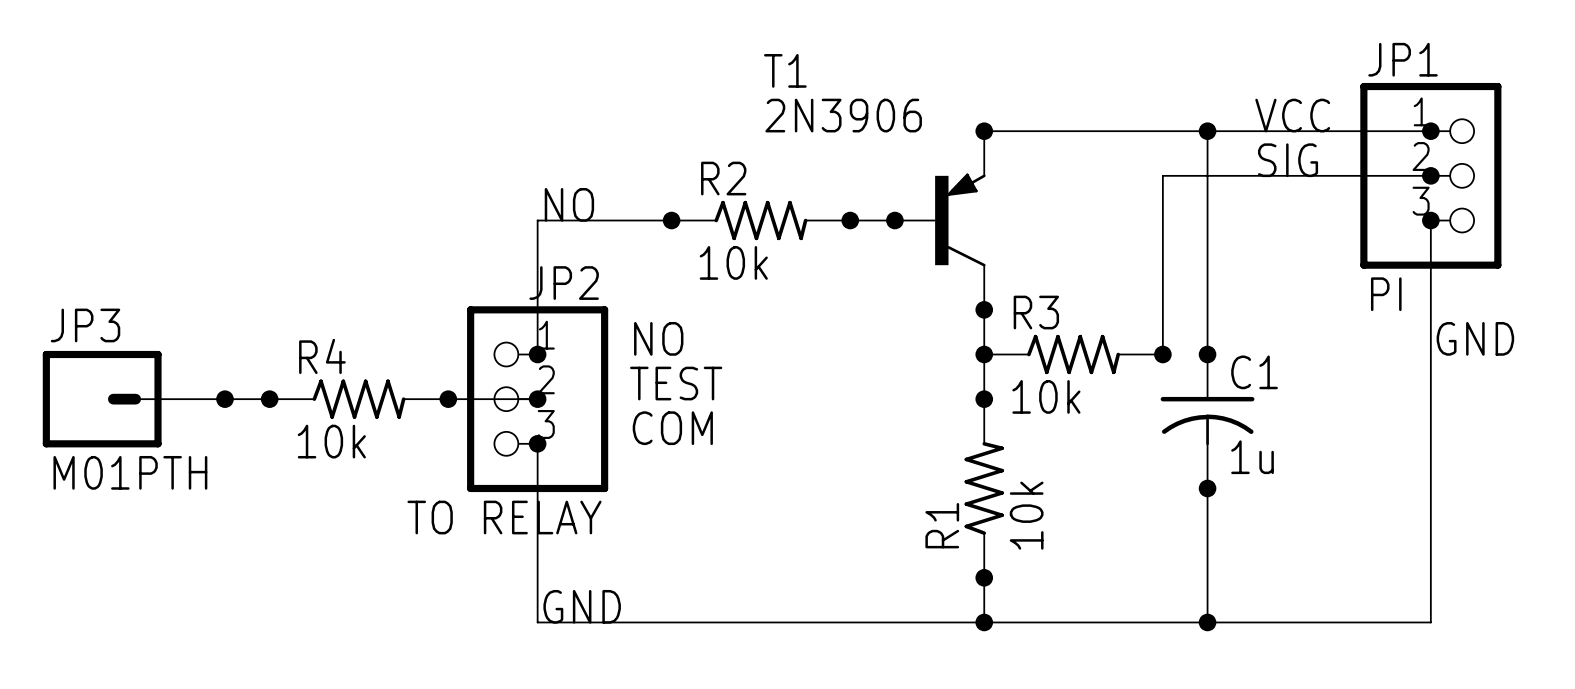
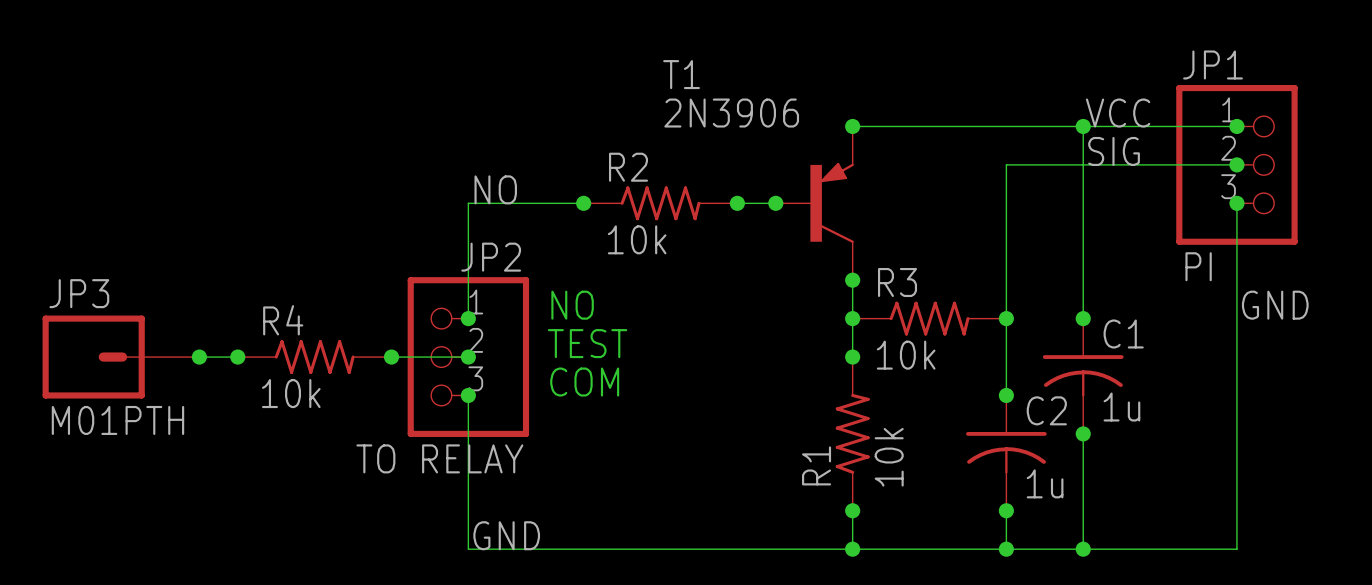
wire: (1207, 131) (1207, 354) -> (1083, 126) (1083, 318)
junction position: (1207, 131) -> (1083, 126)
wire: none -> (1006, 318) (1006, 395)
junction position: (1207, 354) -> (1083, 318)
C1 position: (1207, 421) -> (1083, 376)
junction: none -> (1006, 395)
wire: (1207, 488) (1207, 622) -> (1083, 433) (1083, 549)
junction: (1207, 488) -> none
junction: none -> (1083, 433)
C2: none -> 1u (1006, 453)
wire: none -> (1006, 510) (1006, 549)
junction: none -> (1006, 510)
junction: none -> (1006, 549)
junction: (1207, 622) -> none
junction: none -> (1083, 549)

